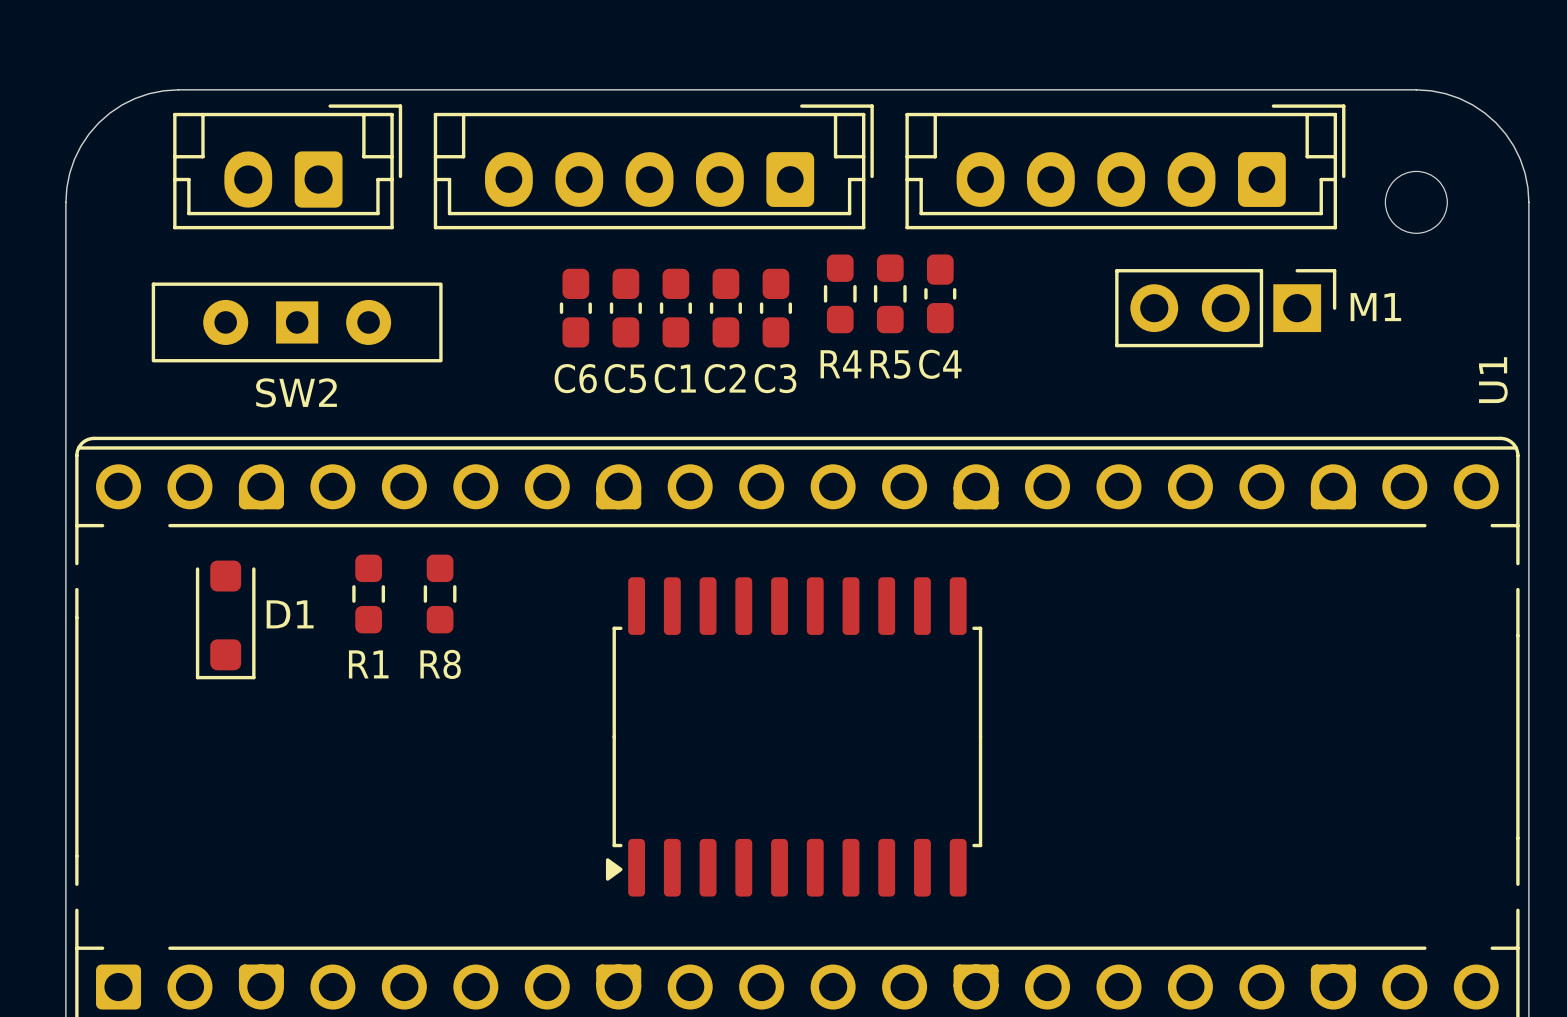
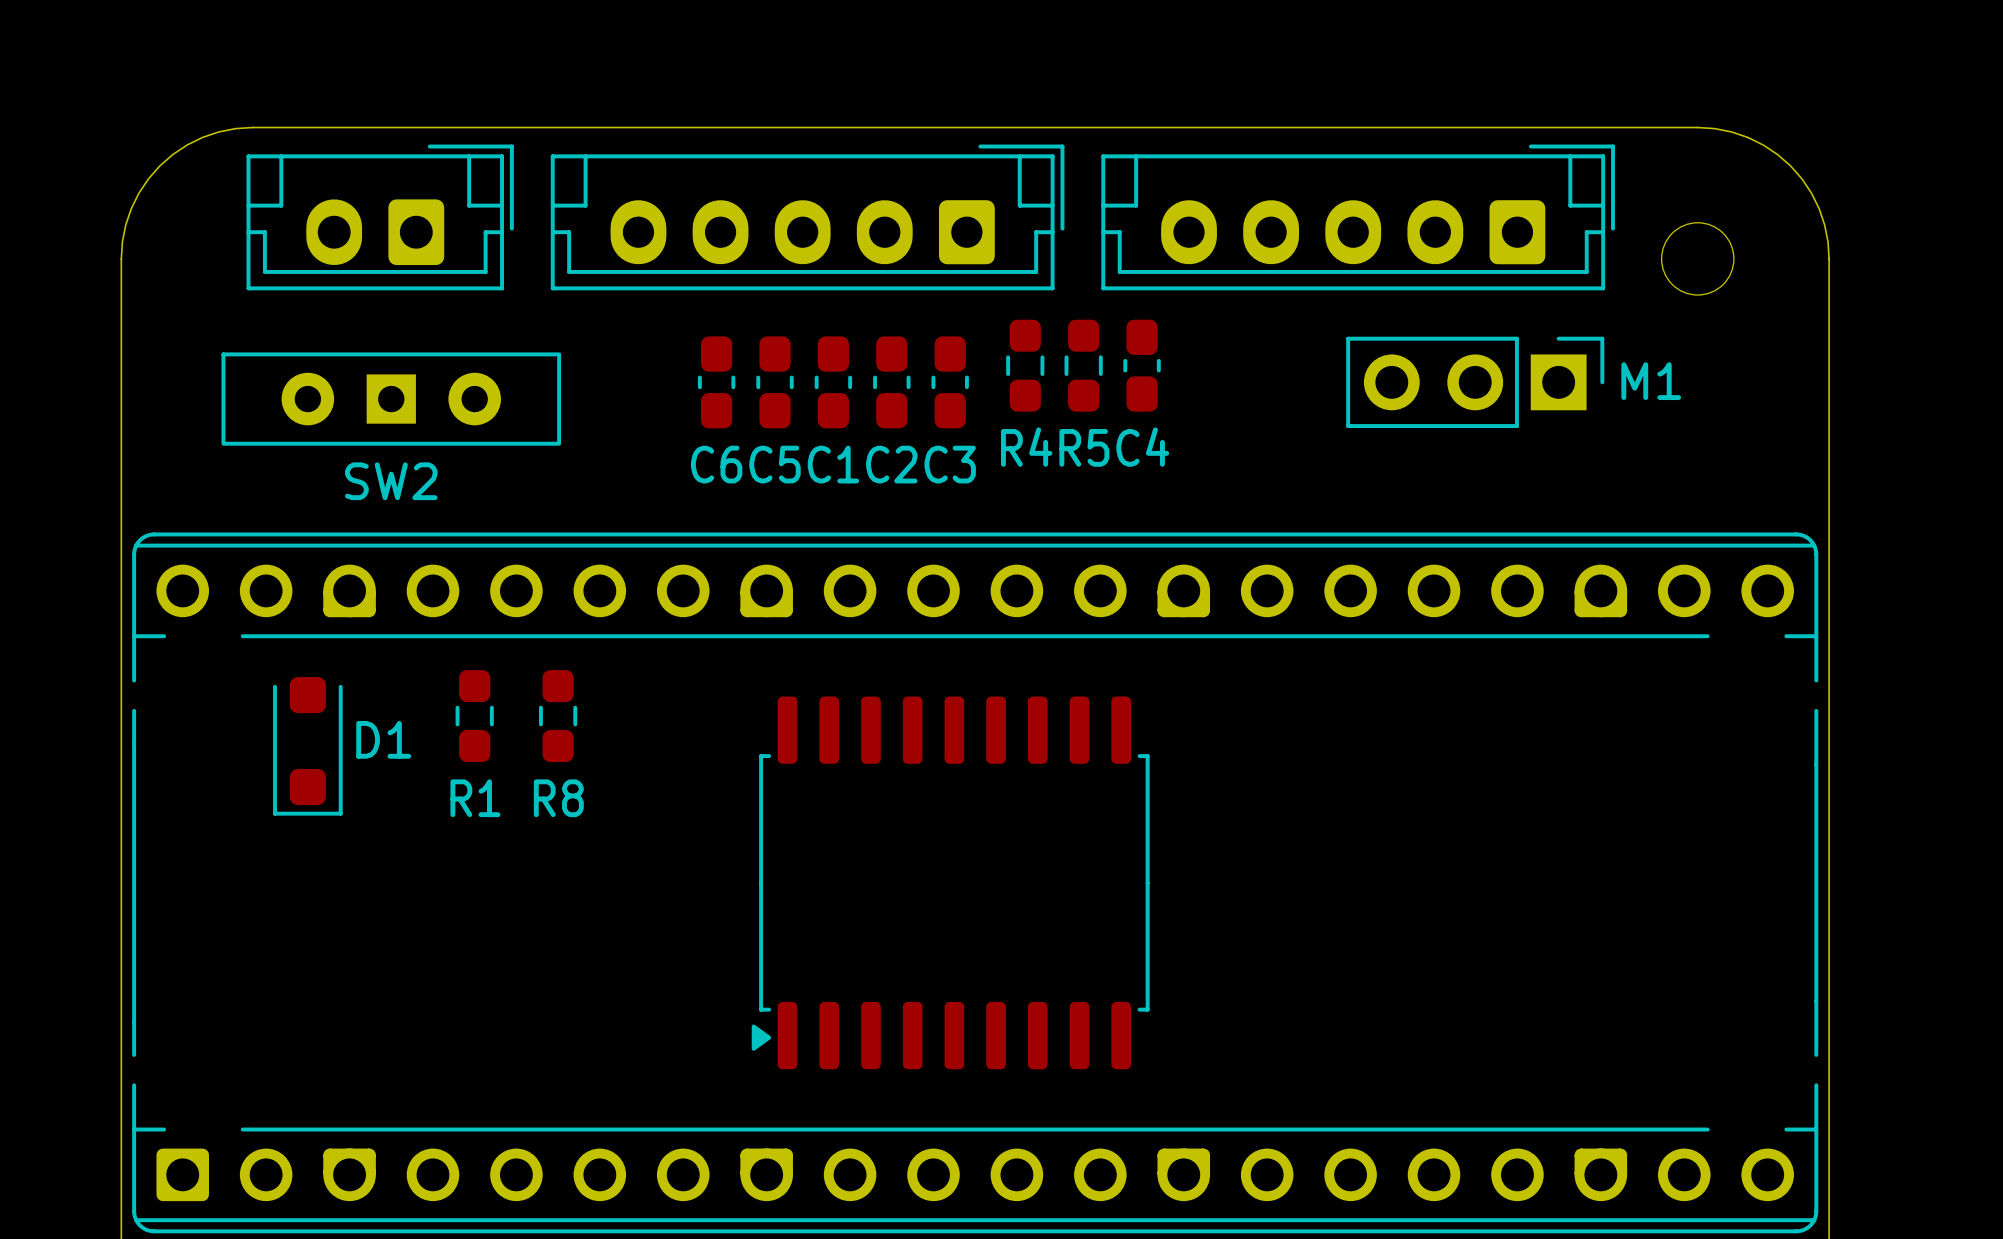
U1 name: U1 (1493, 380) -> none
part footprint: [605, 577, 983, 897] -> [751, 696, 1150, 1070]

